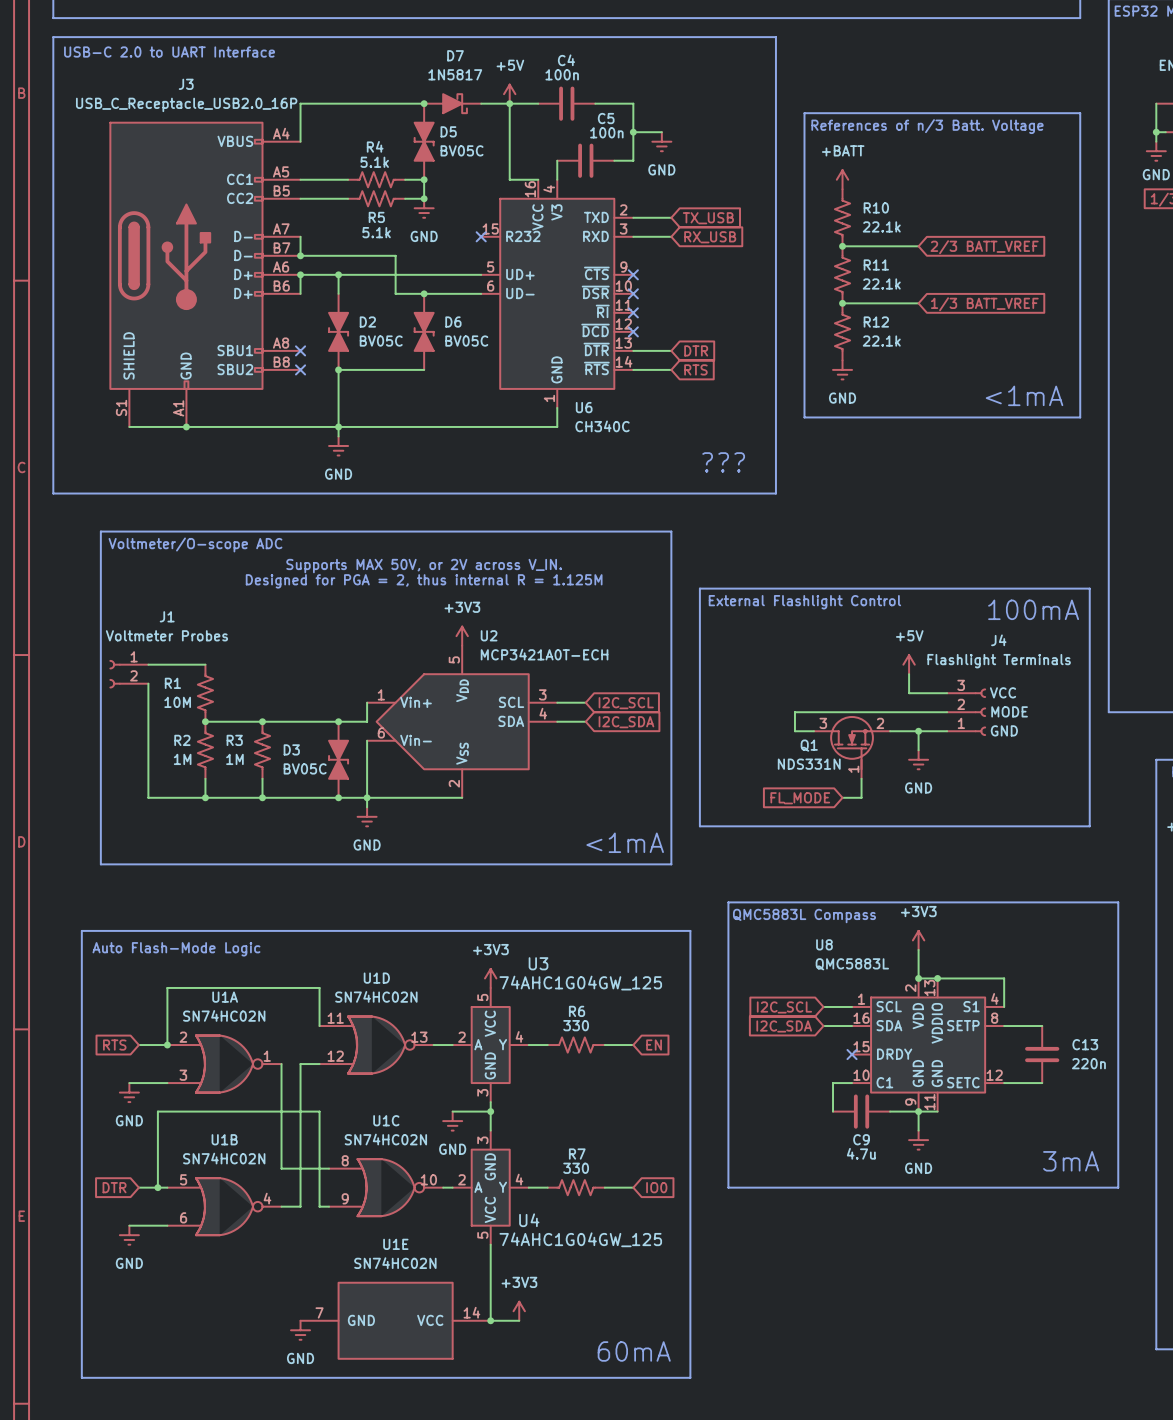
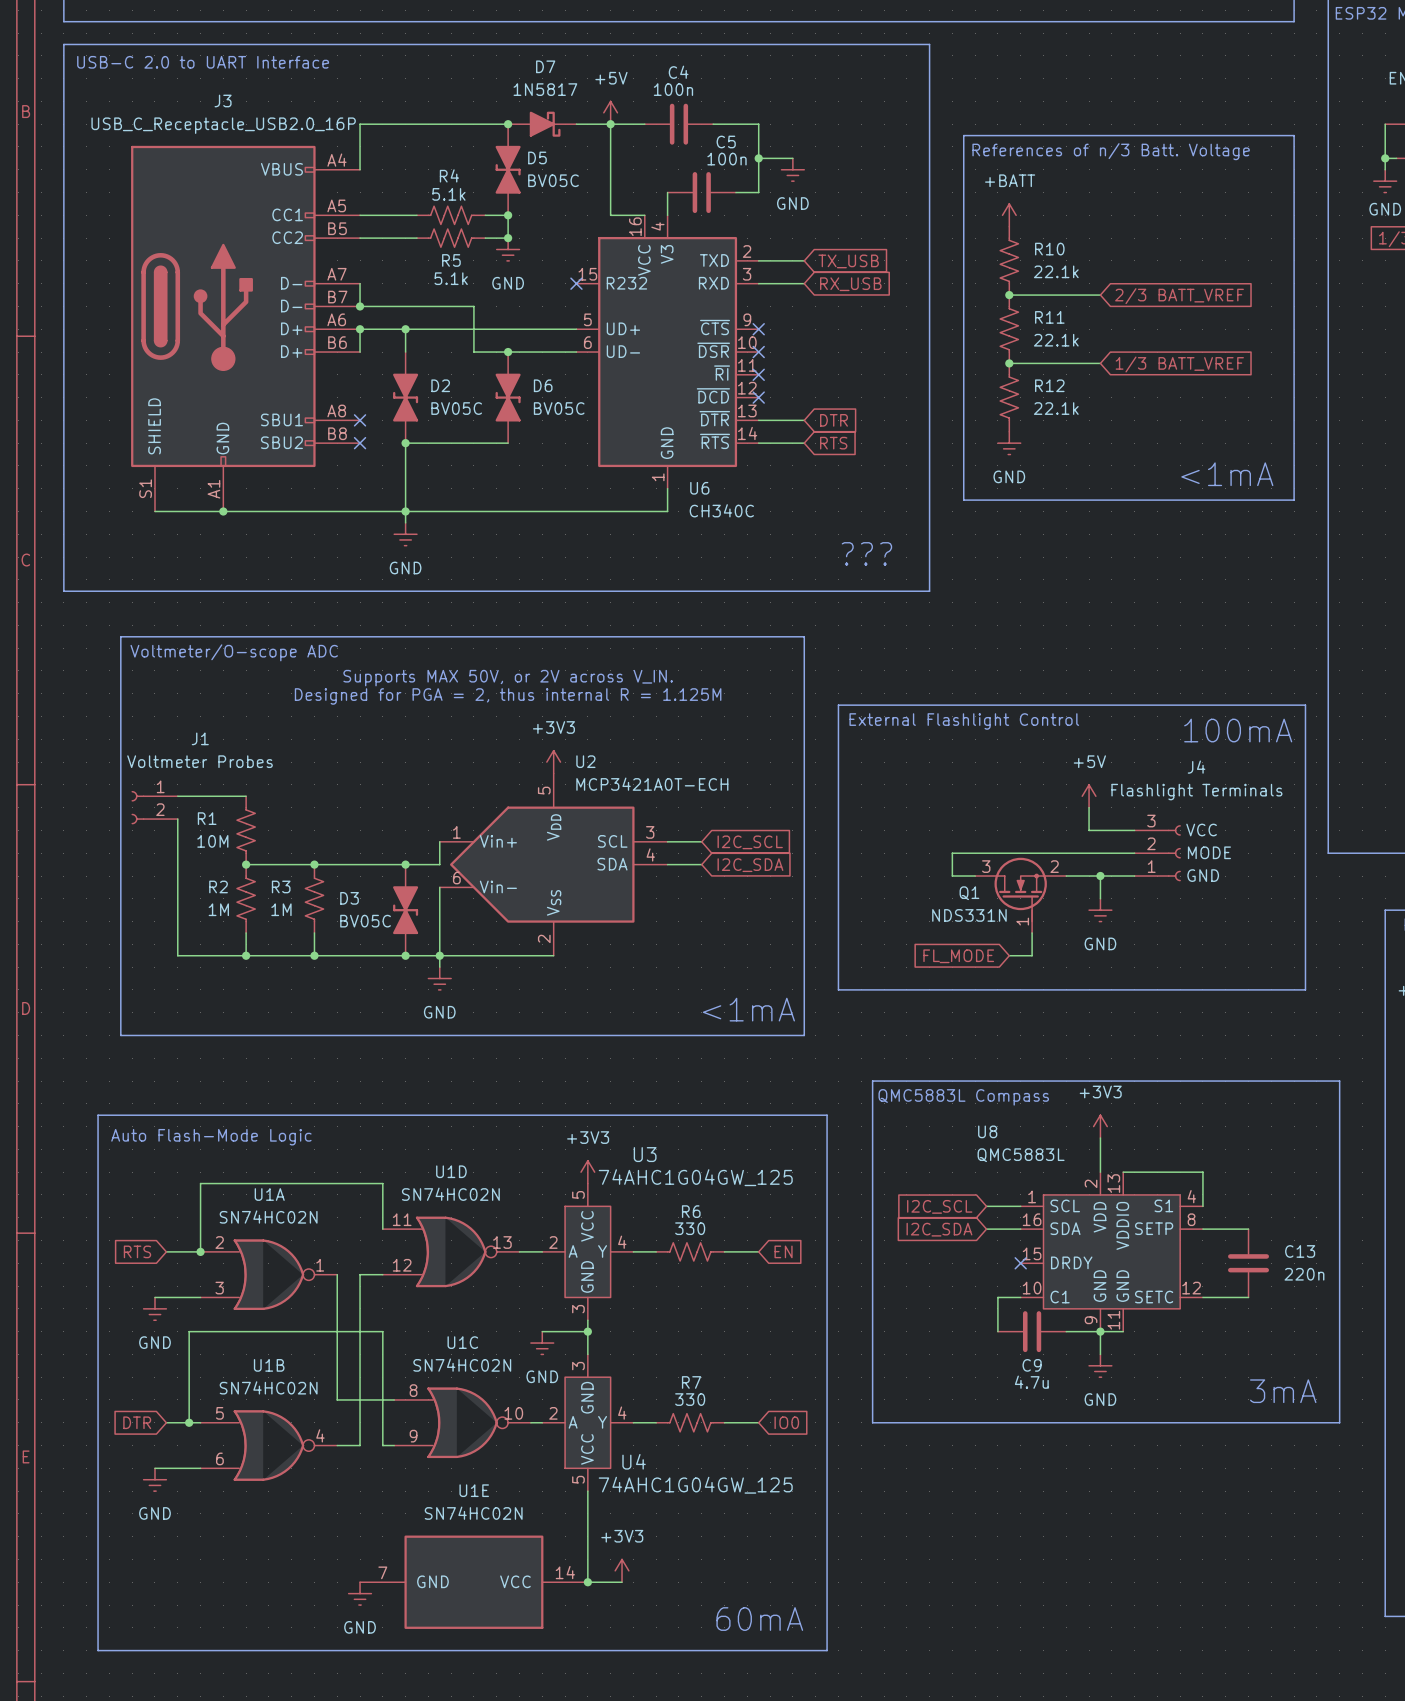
wire: (918, 978) (937, 978) -> none
junction: (918, 978) -> none
junction: (937, 978) -> none

